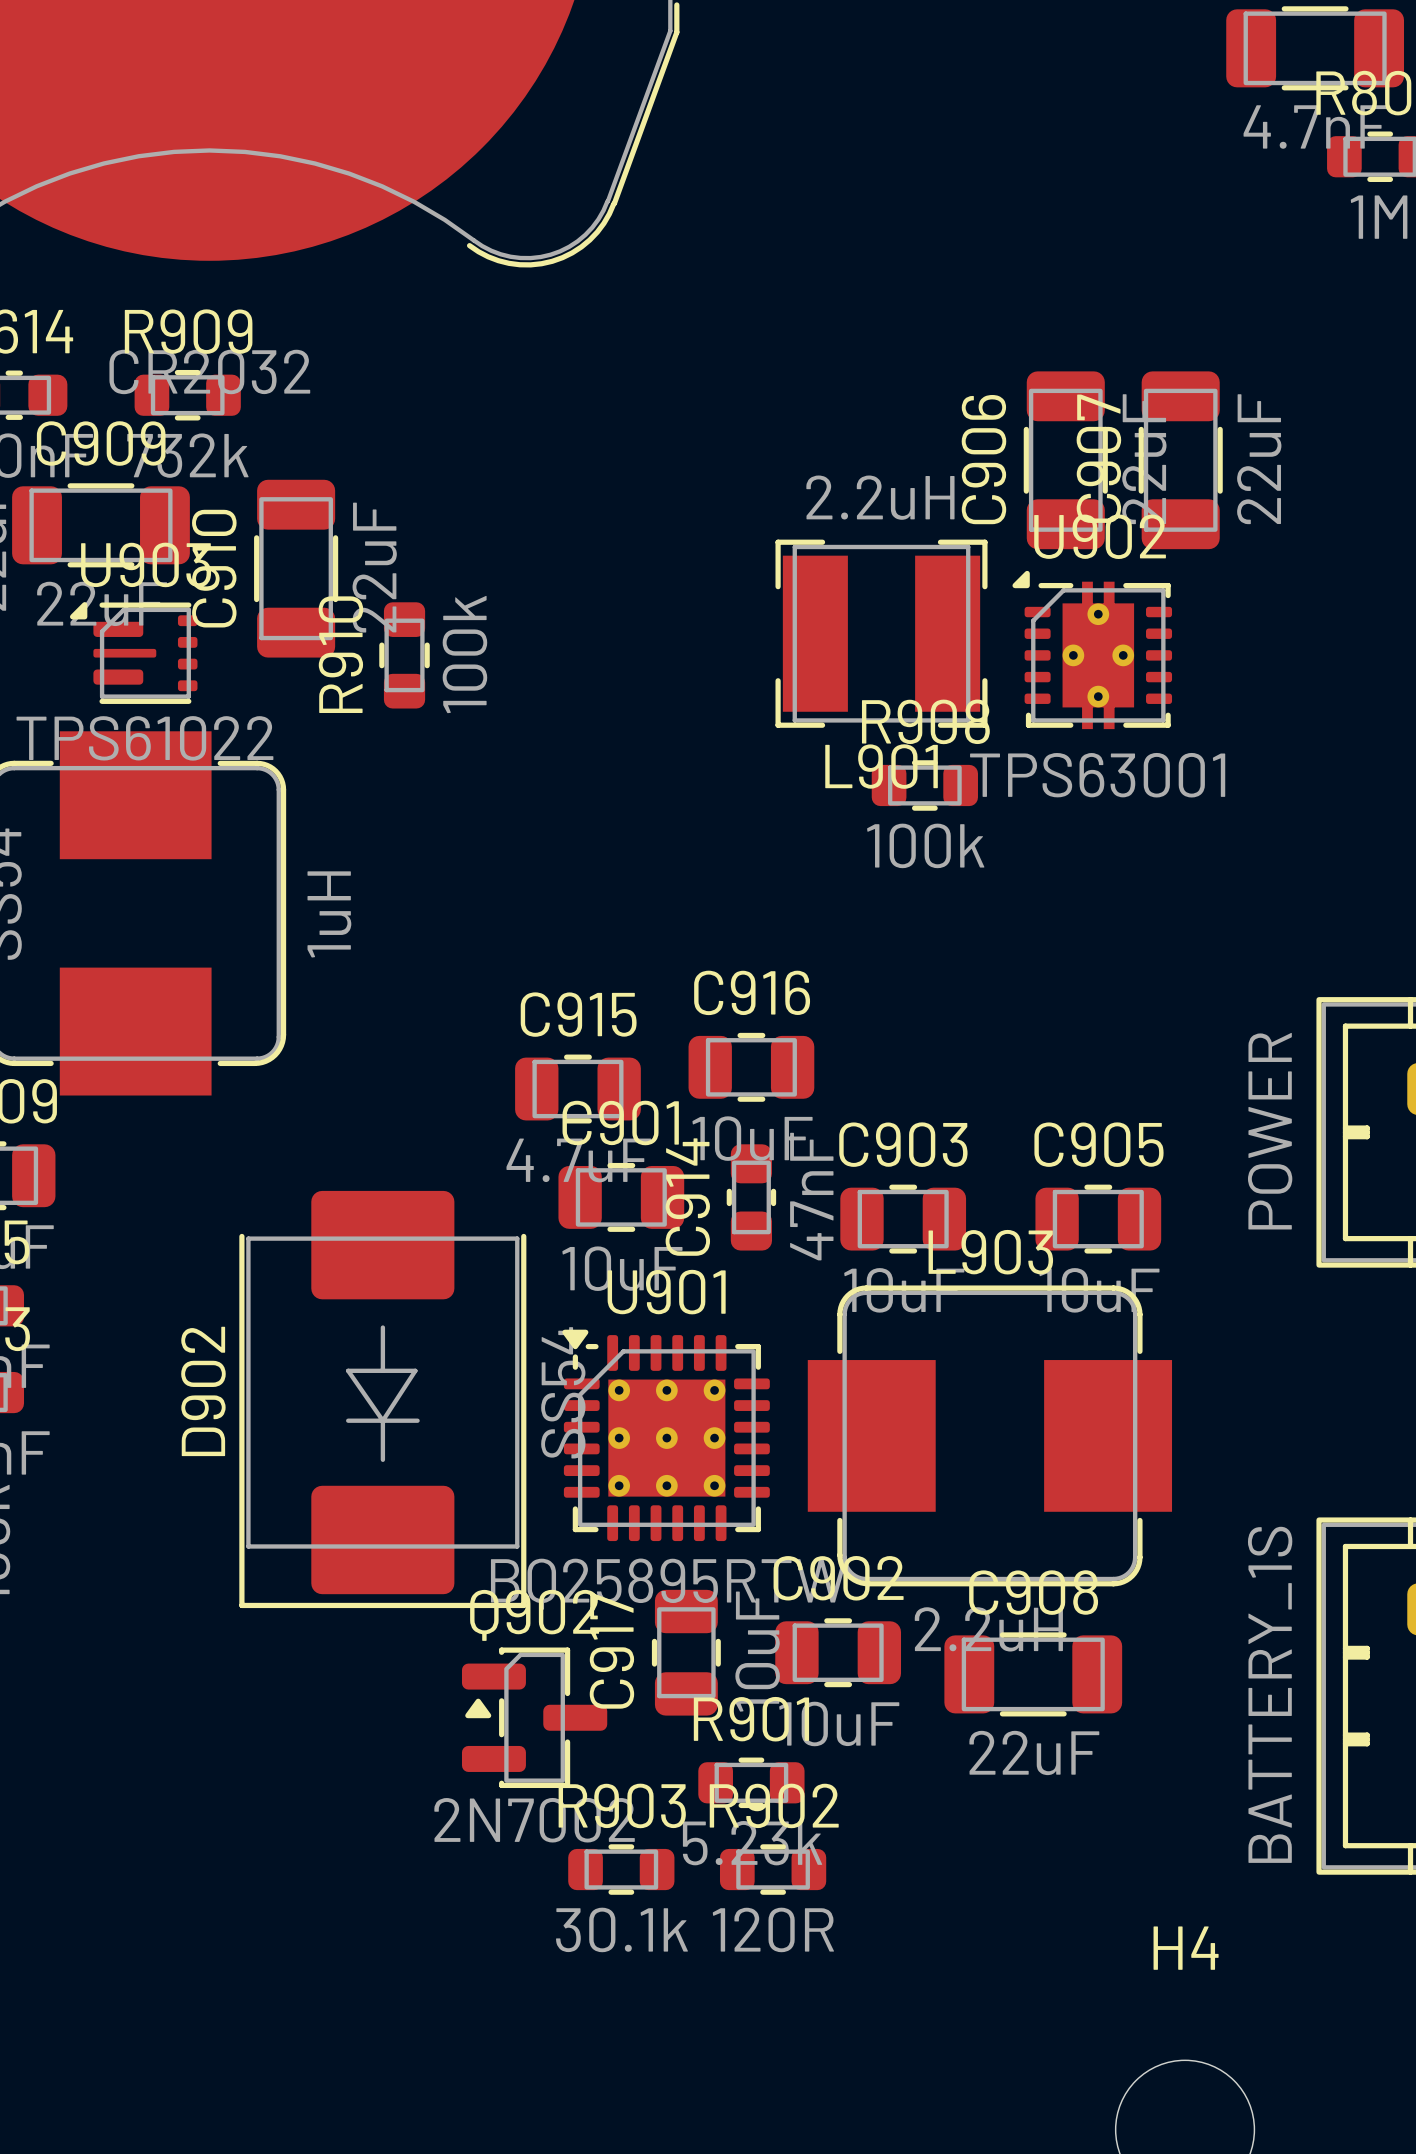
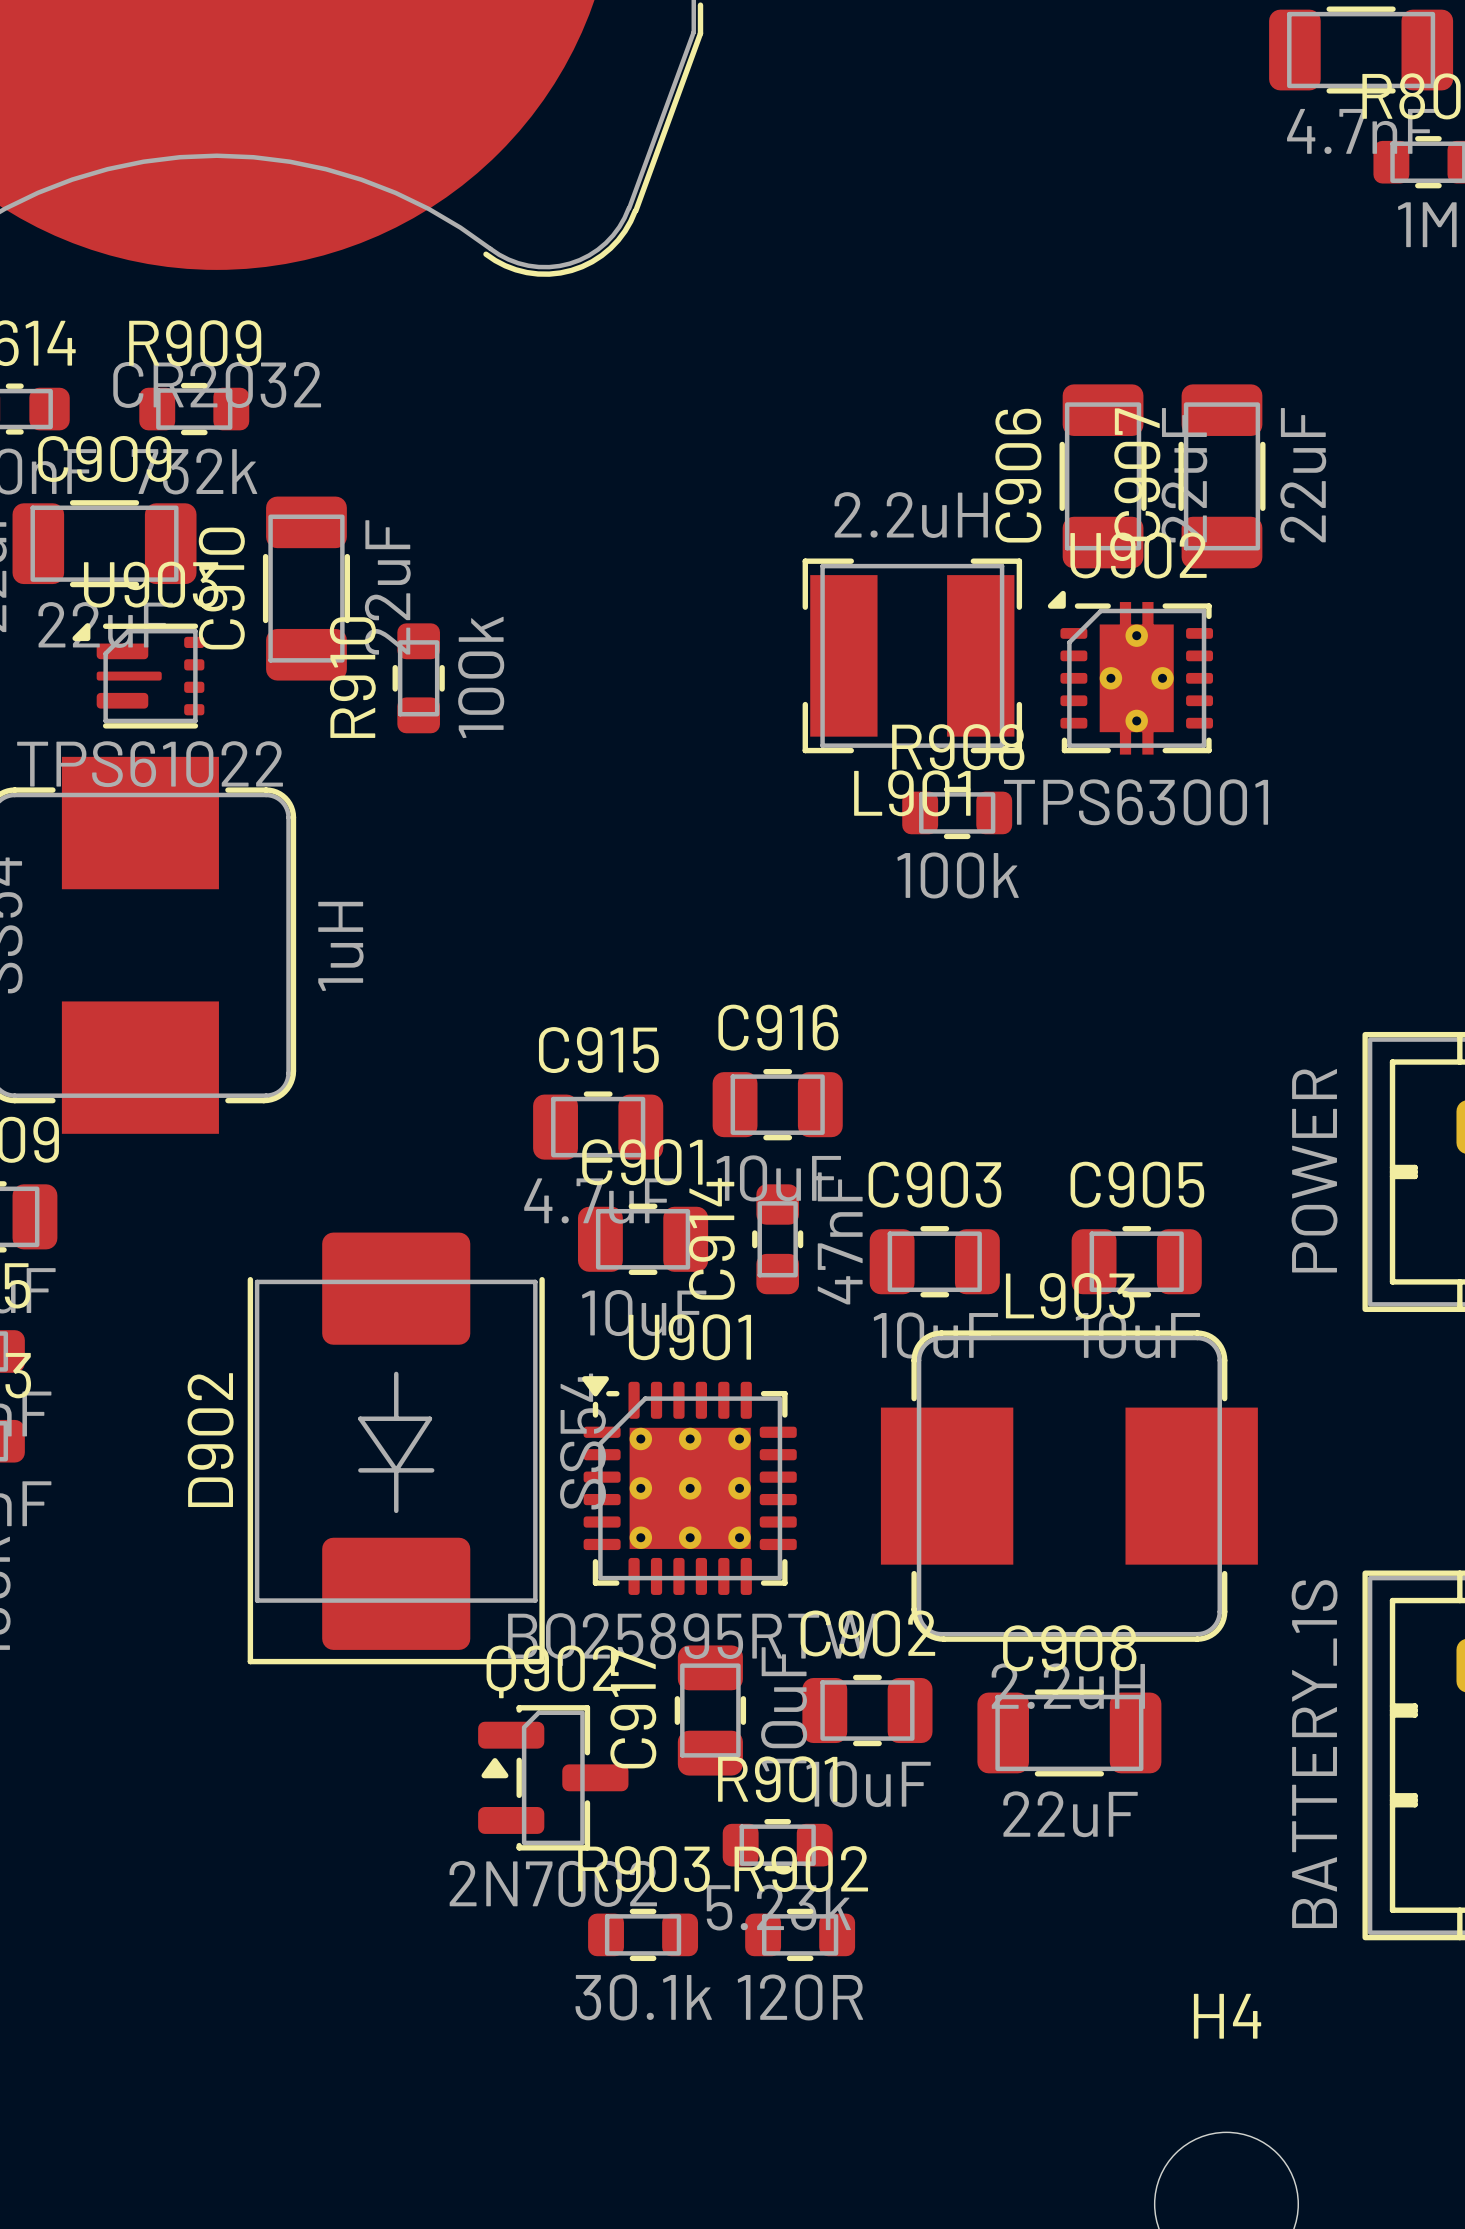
L903 position: (989, 1435) -> (1069, 1486)

